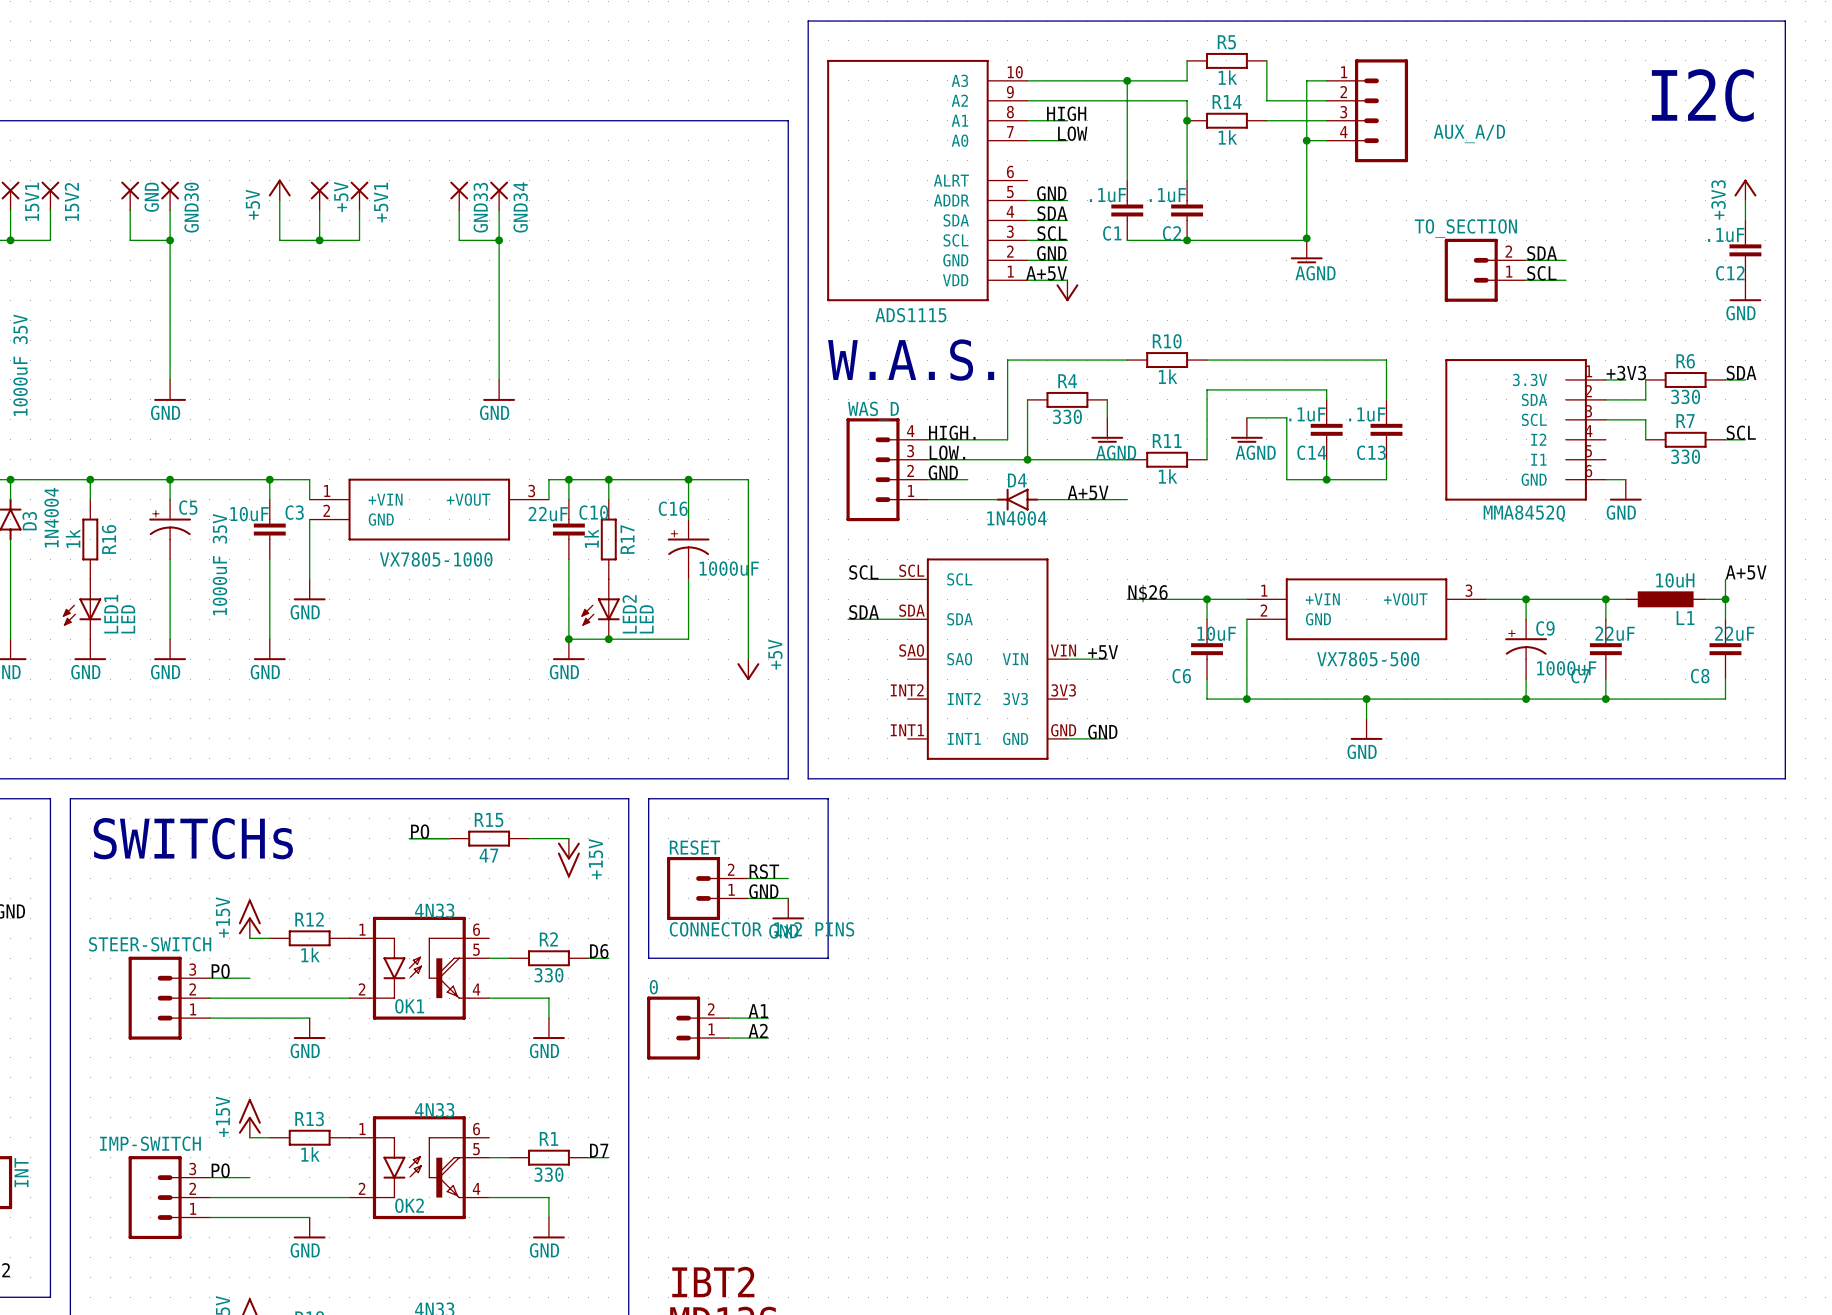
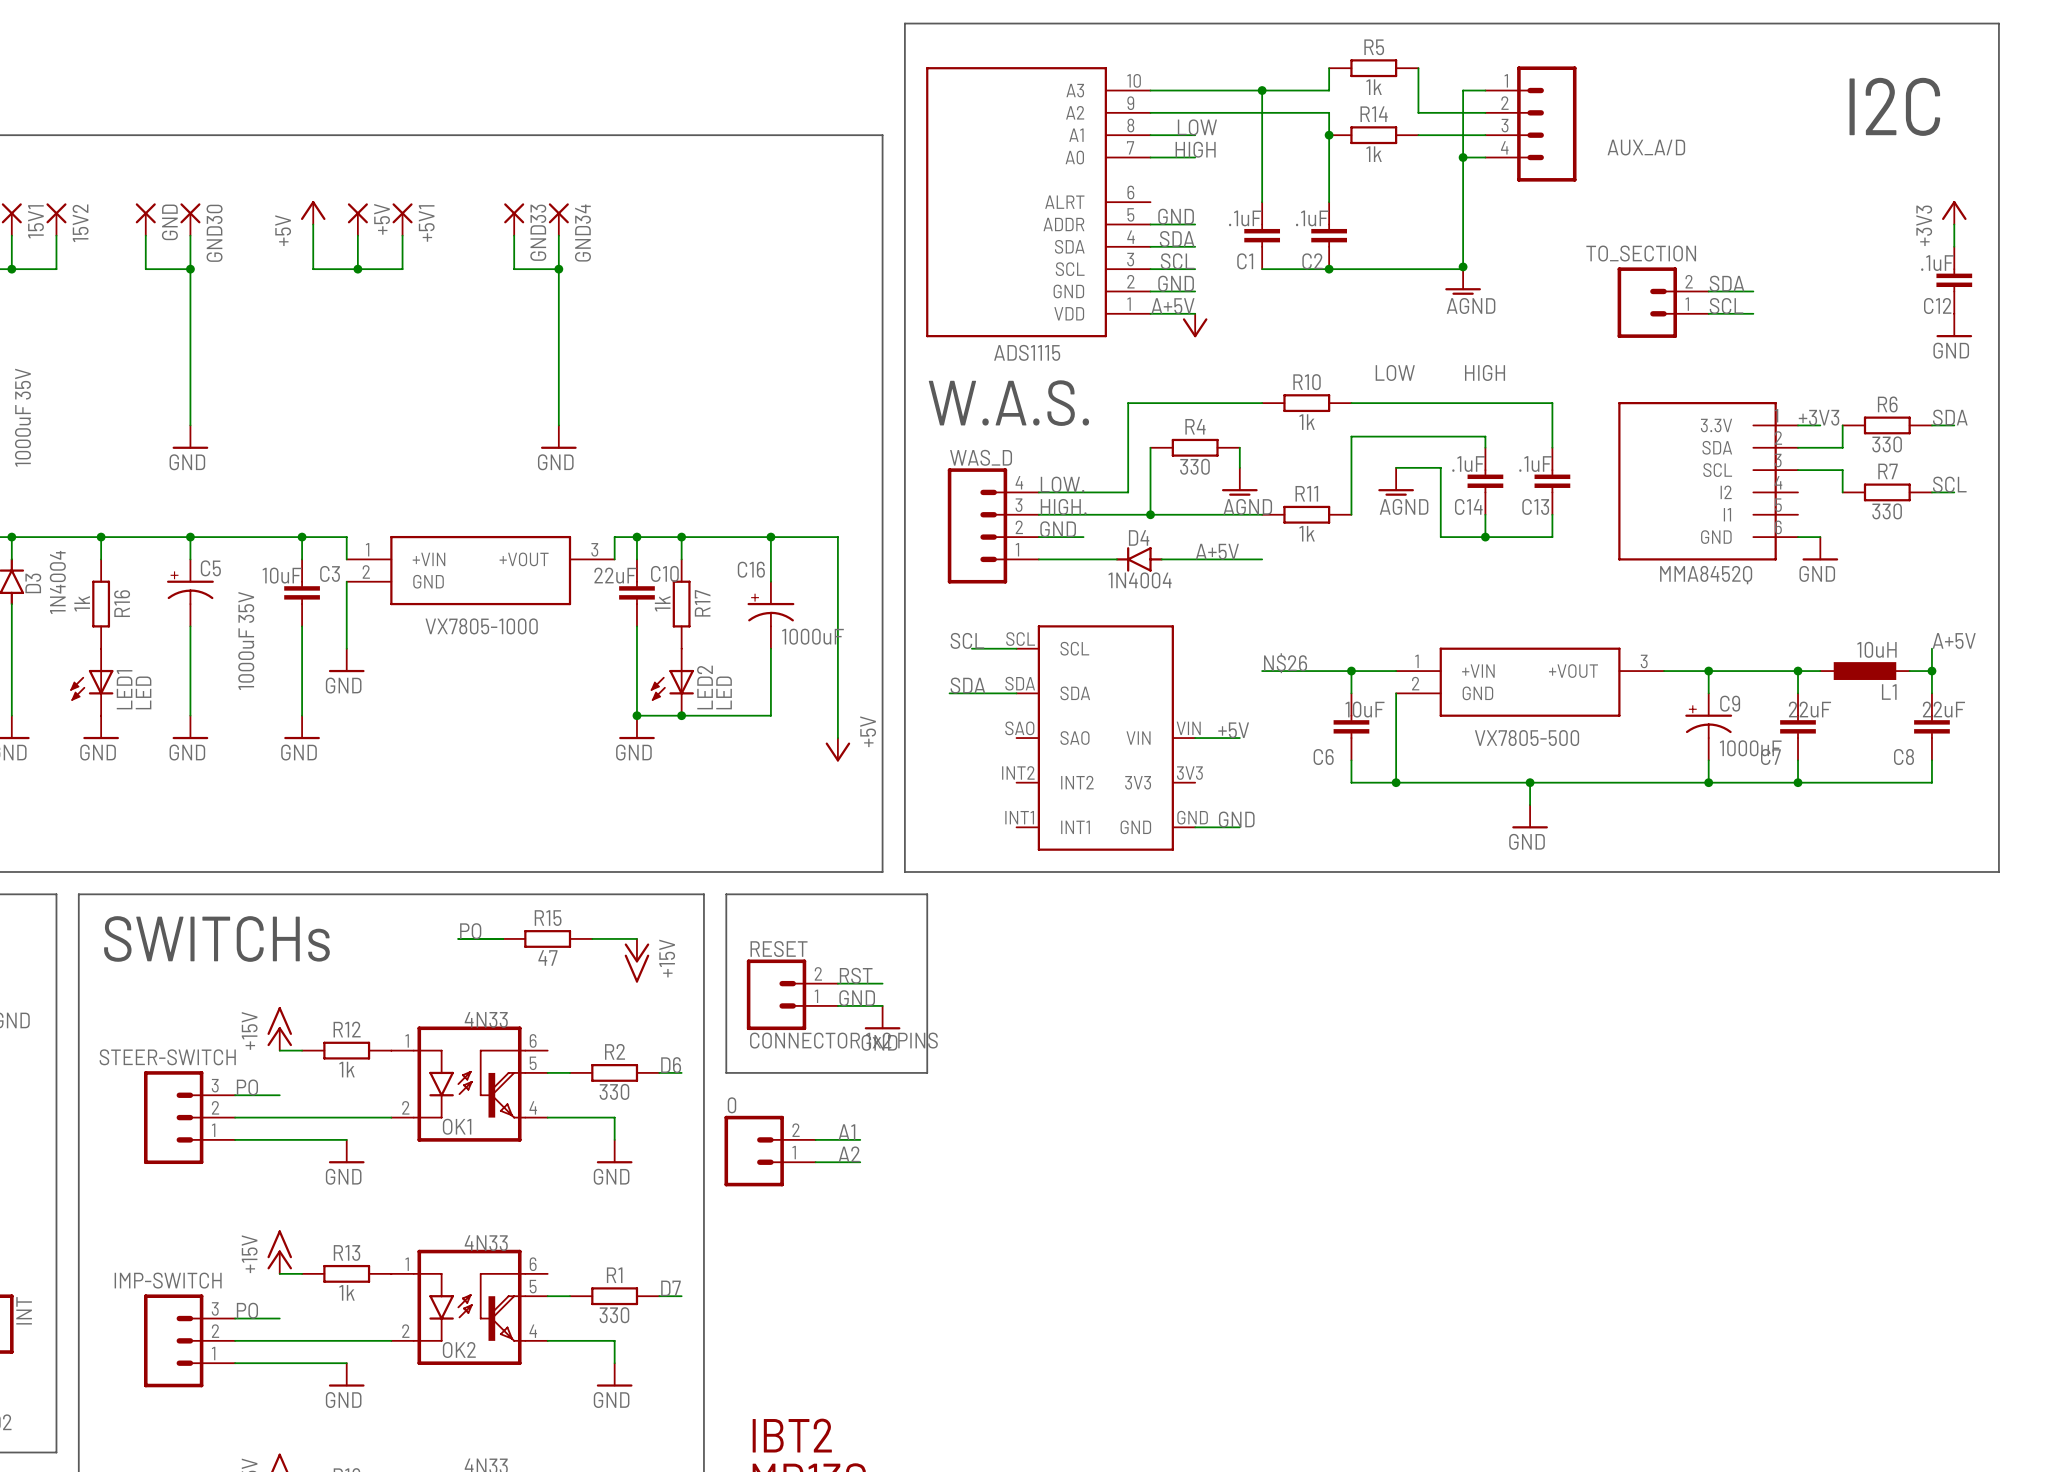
label: HIGH (1066, 113) -> LOW (1197, 127)
label: LOW (1072, 133) -> HIGH (1195, 149)
label: none -> LOW (1395, 372)
label: none -> HIGH (1485, 372)
label: HIGH. (952, 432) -> LOW. (1062, 484)
label: LOW. (947, 452) -> HIGH. (1063, 506)

